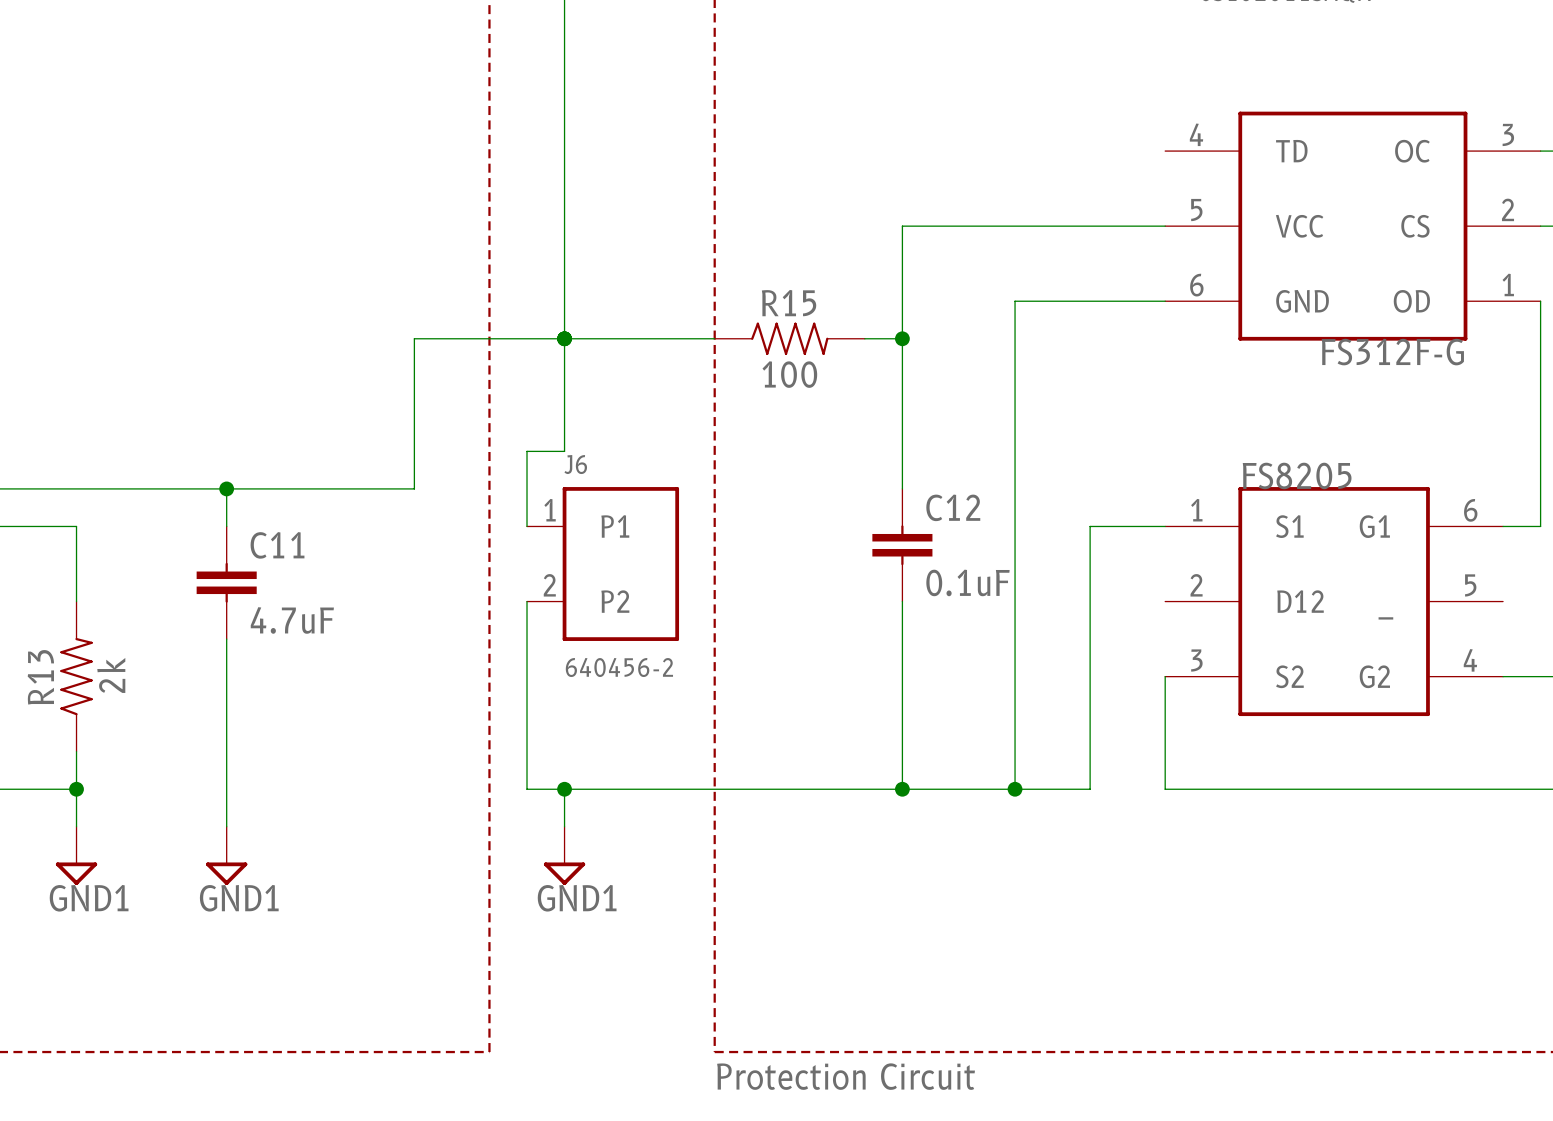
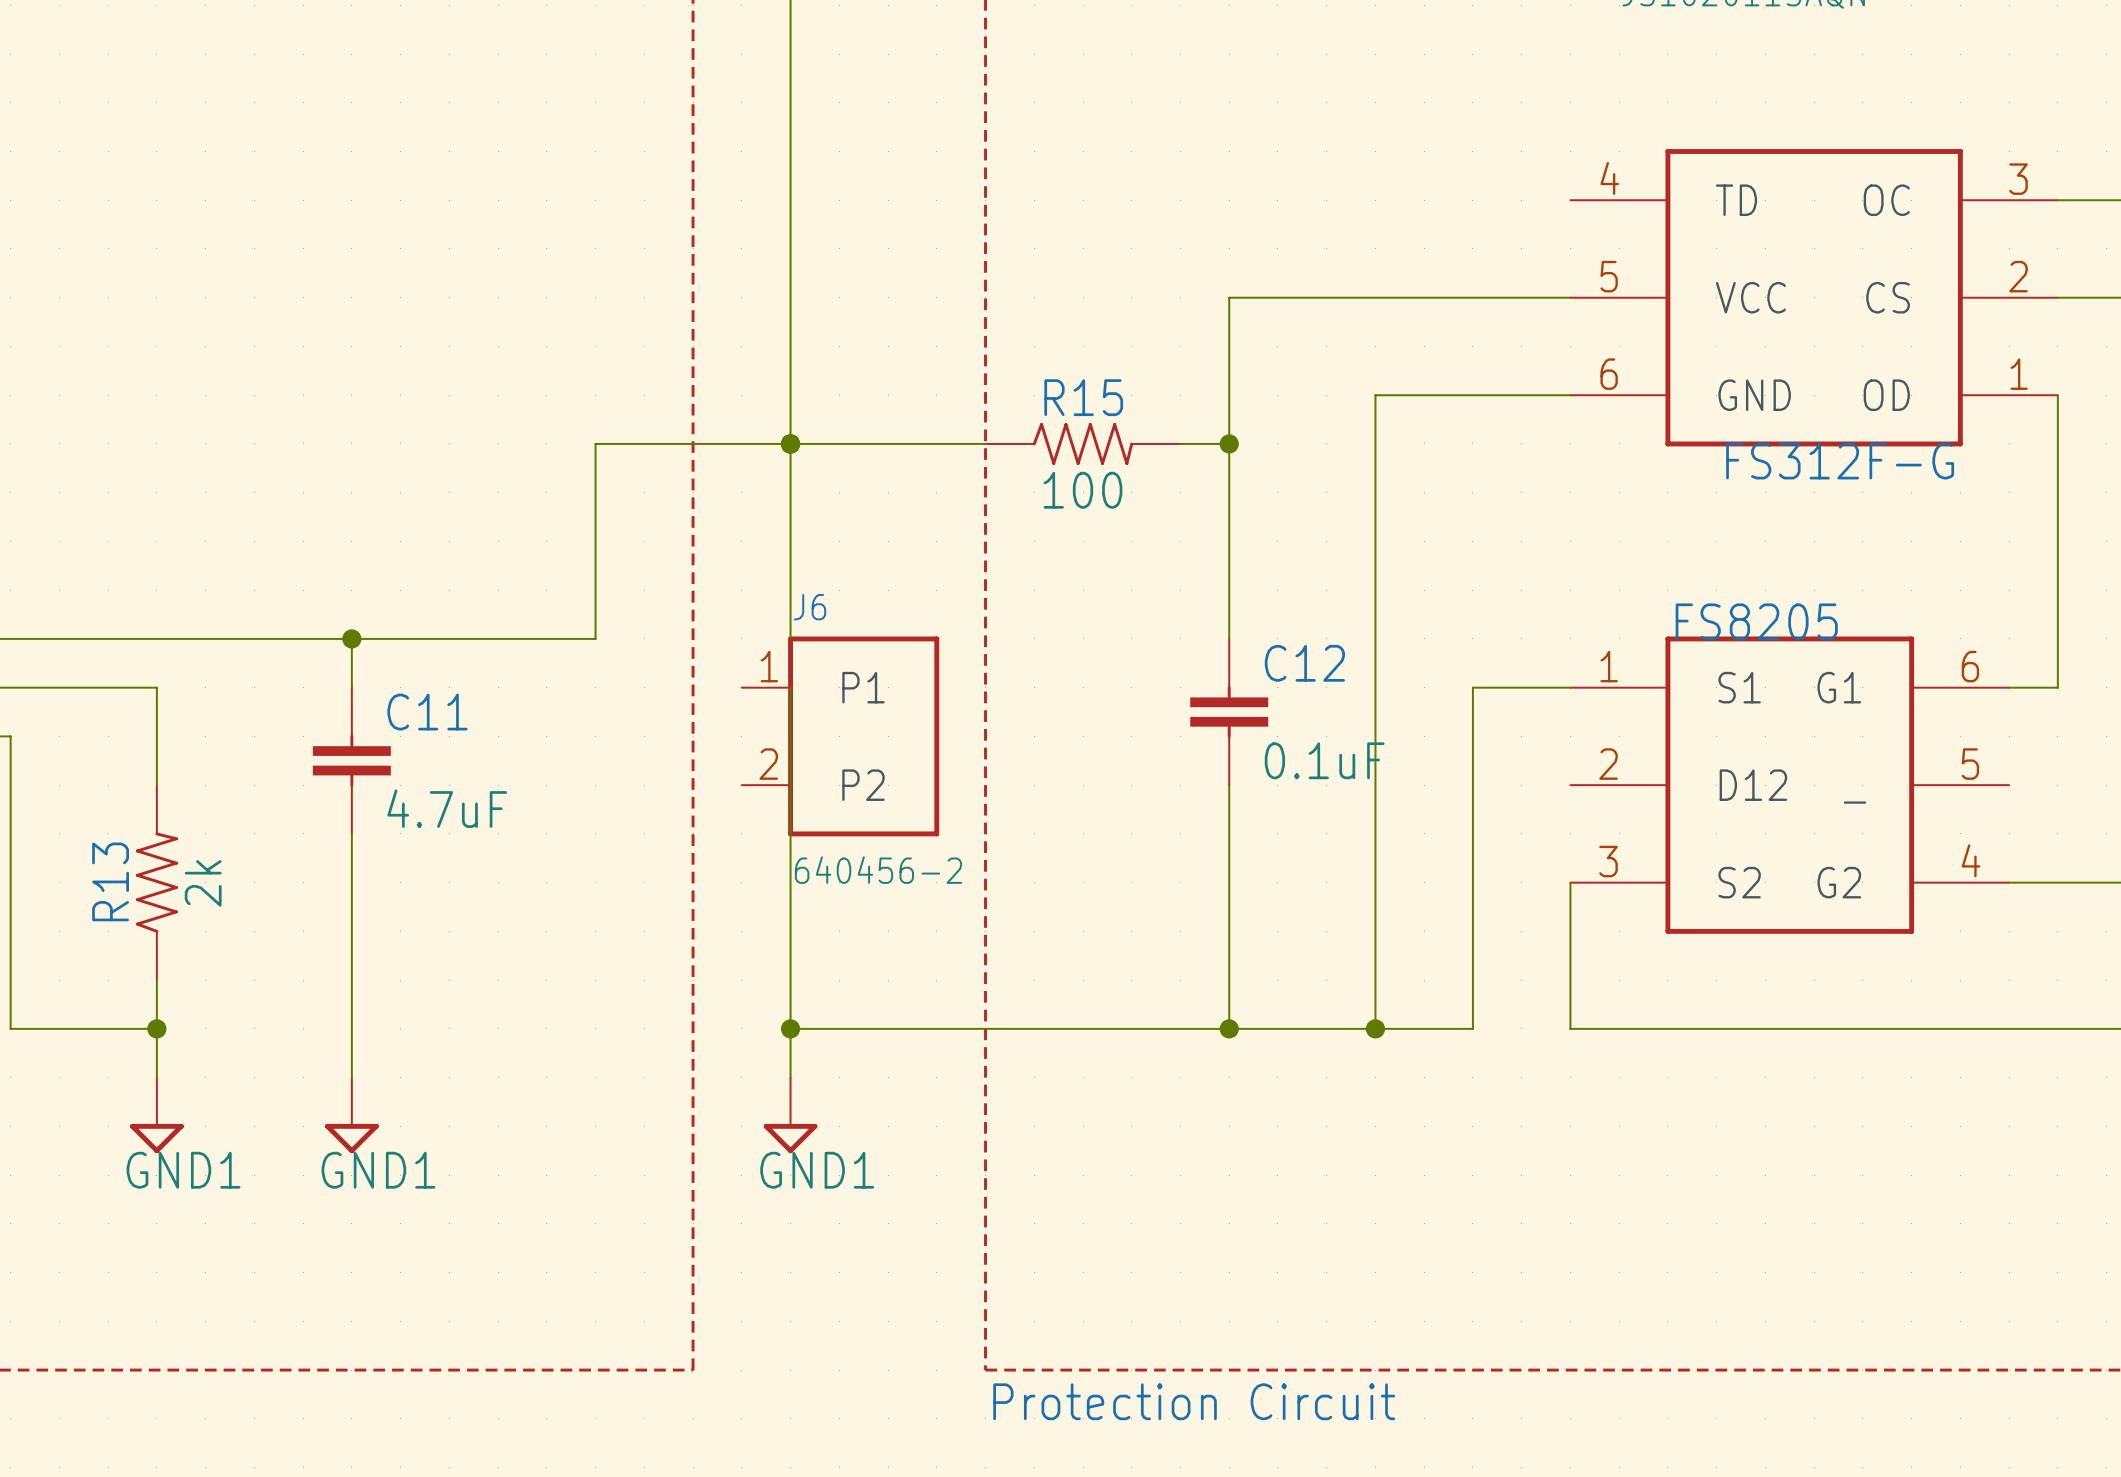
wire: (564, 451) (527, 451) (527, 526) -> (790, 590) (790, 638)
wire: (527, 601) (527, 789) (564, 789) -> (790, 687) (790, 1028)

